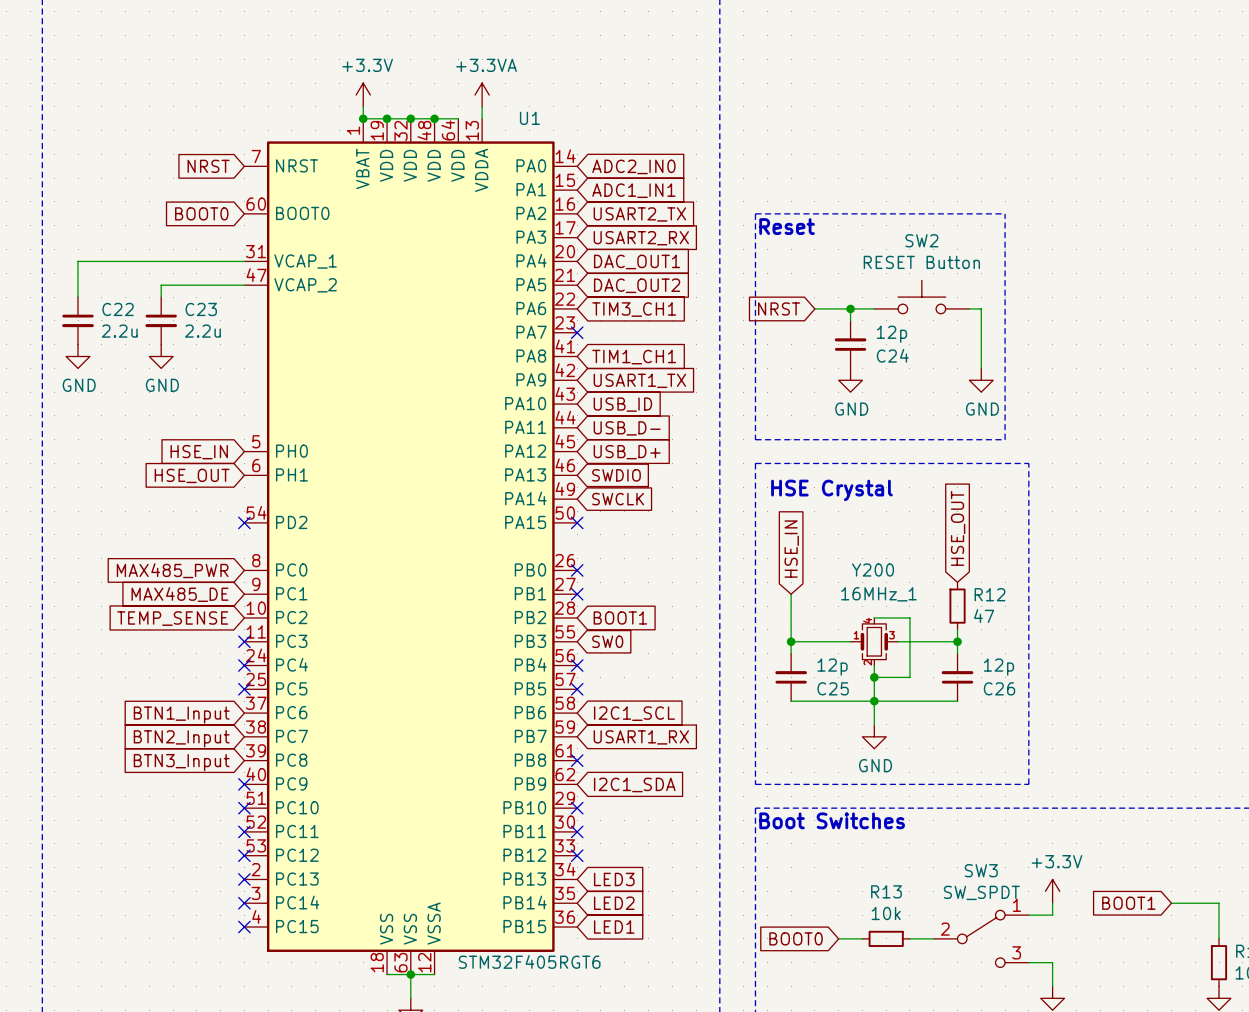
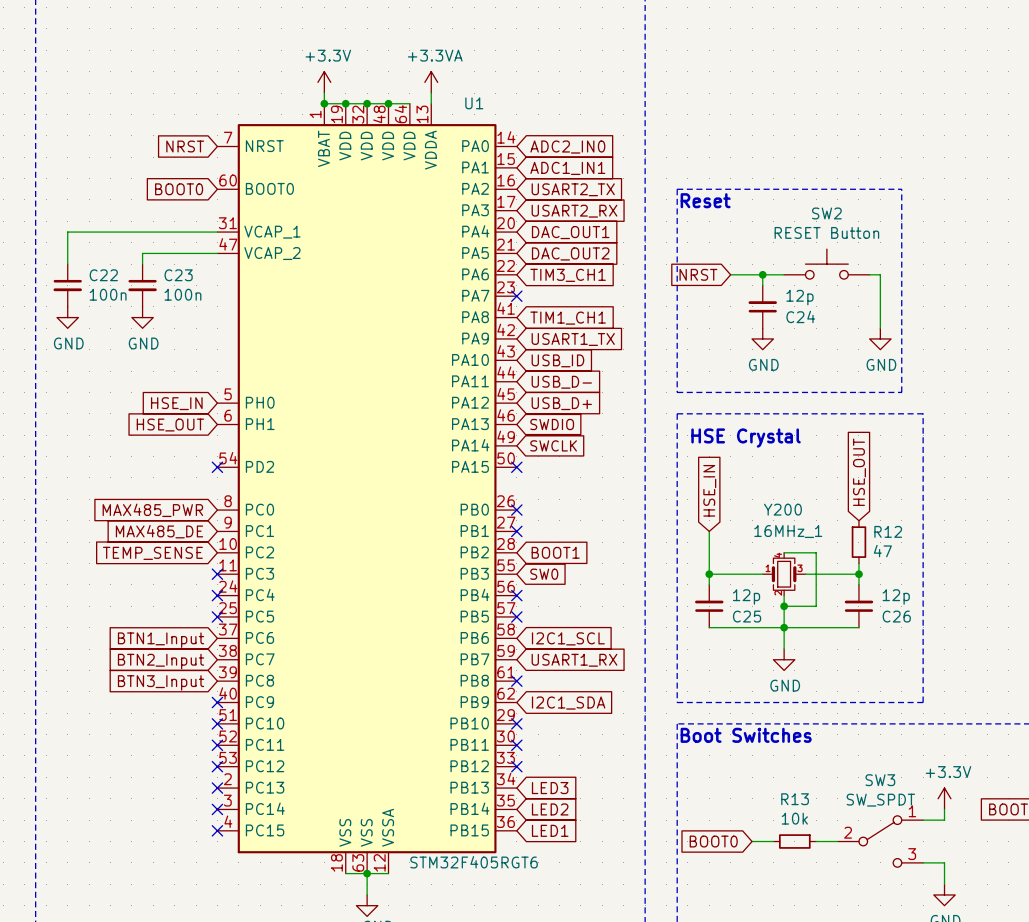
C22 value: 2.2u (119, 331) -> 100n (108, 294)
C23 value: 2.2u (202, 331) -> 100n (182, 294)

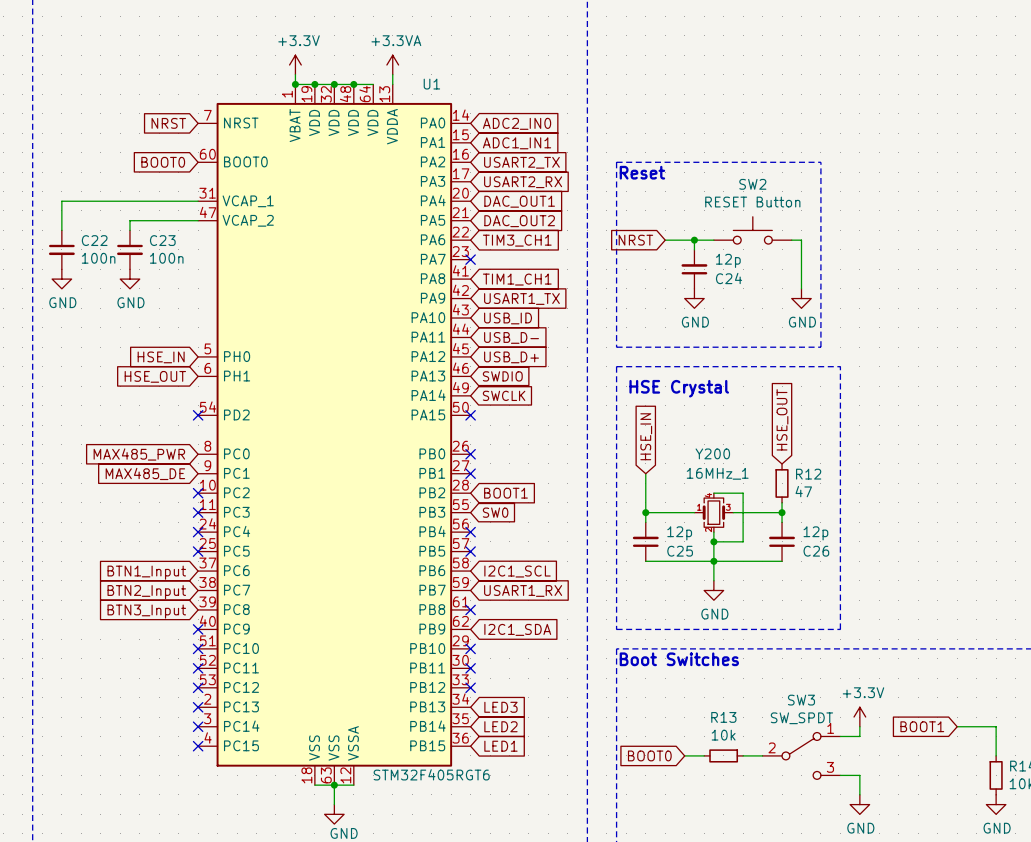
no-connect mark: none -> (198, 493)
global label: TEMP_SENSE (152, 553) -> none

